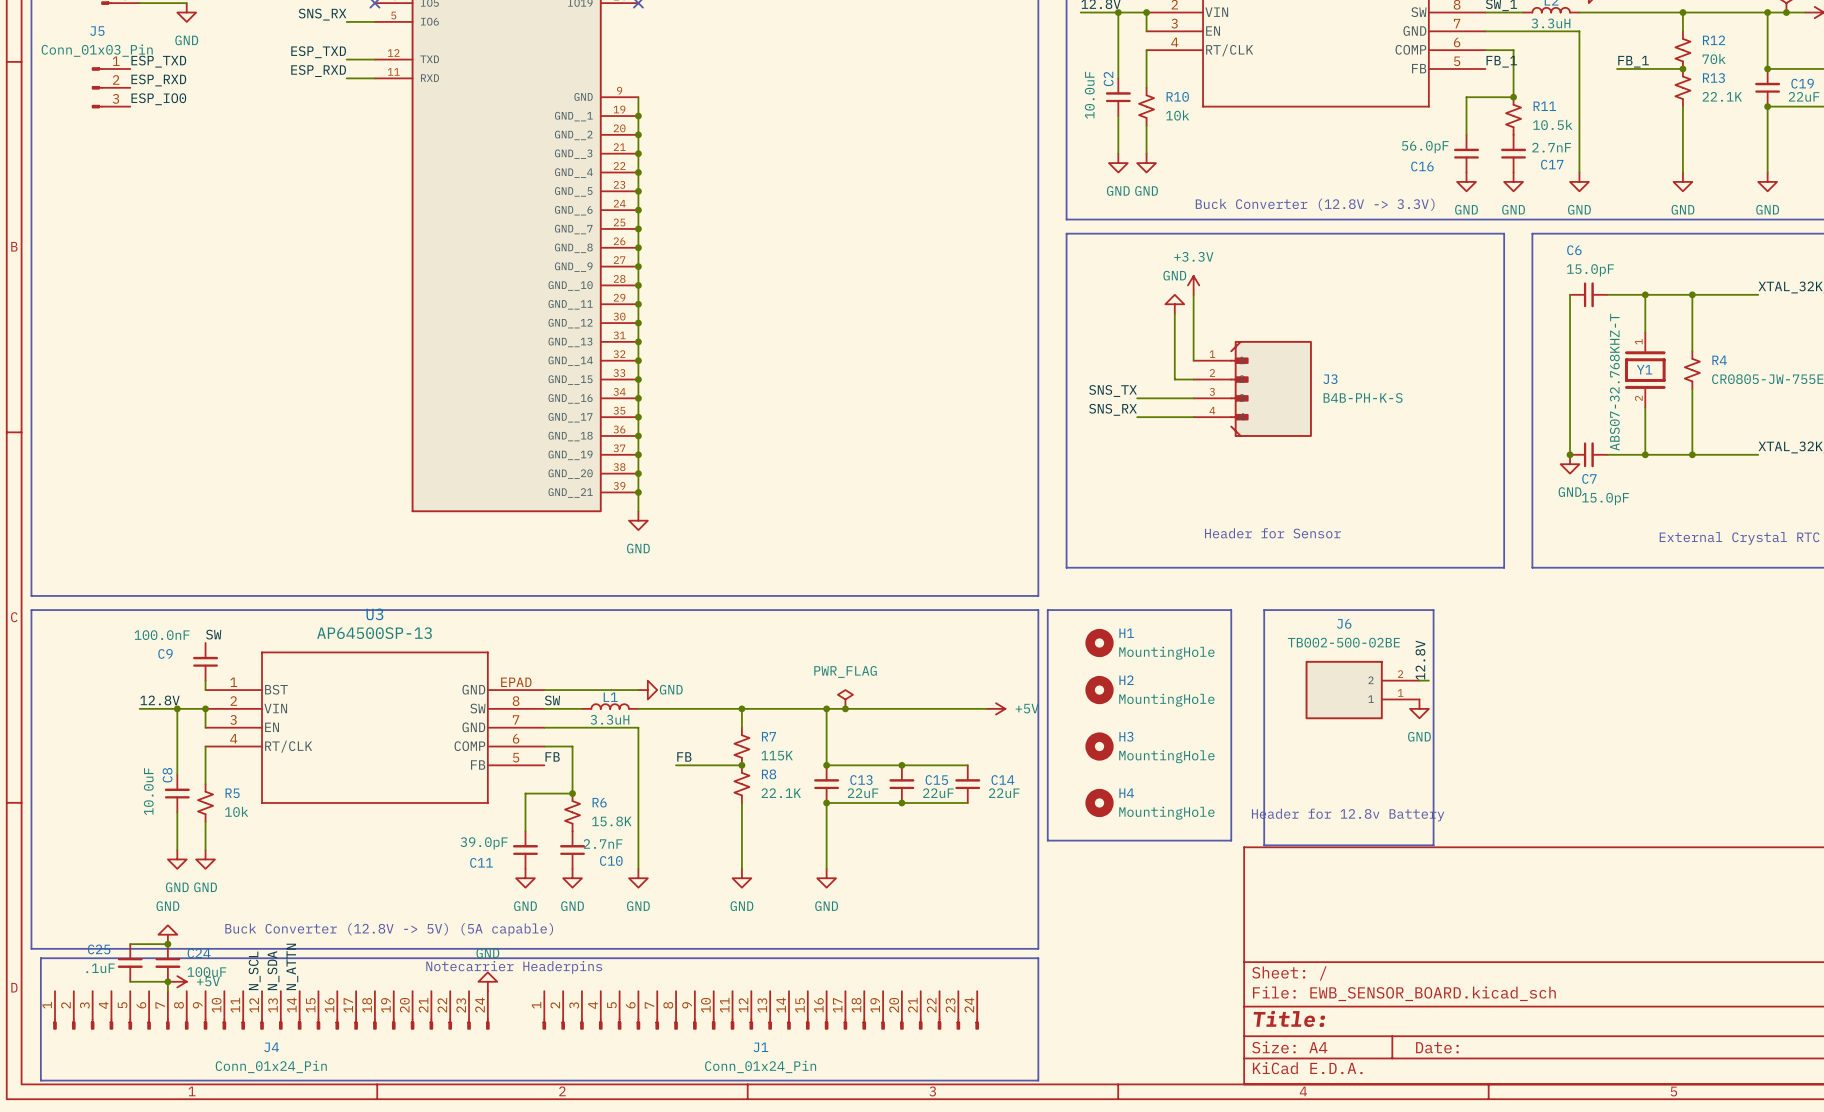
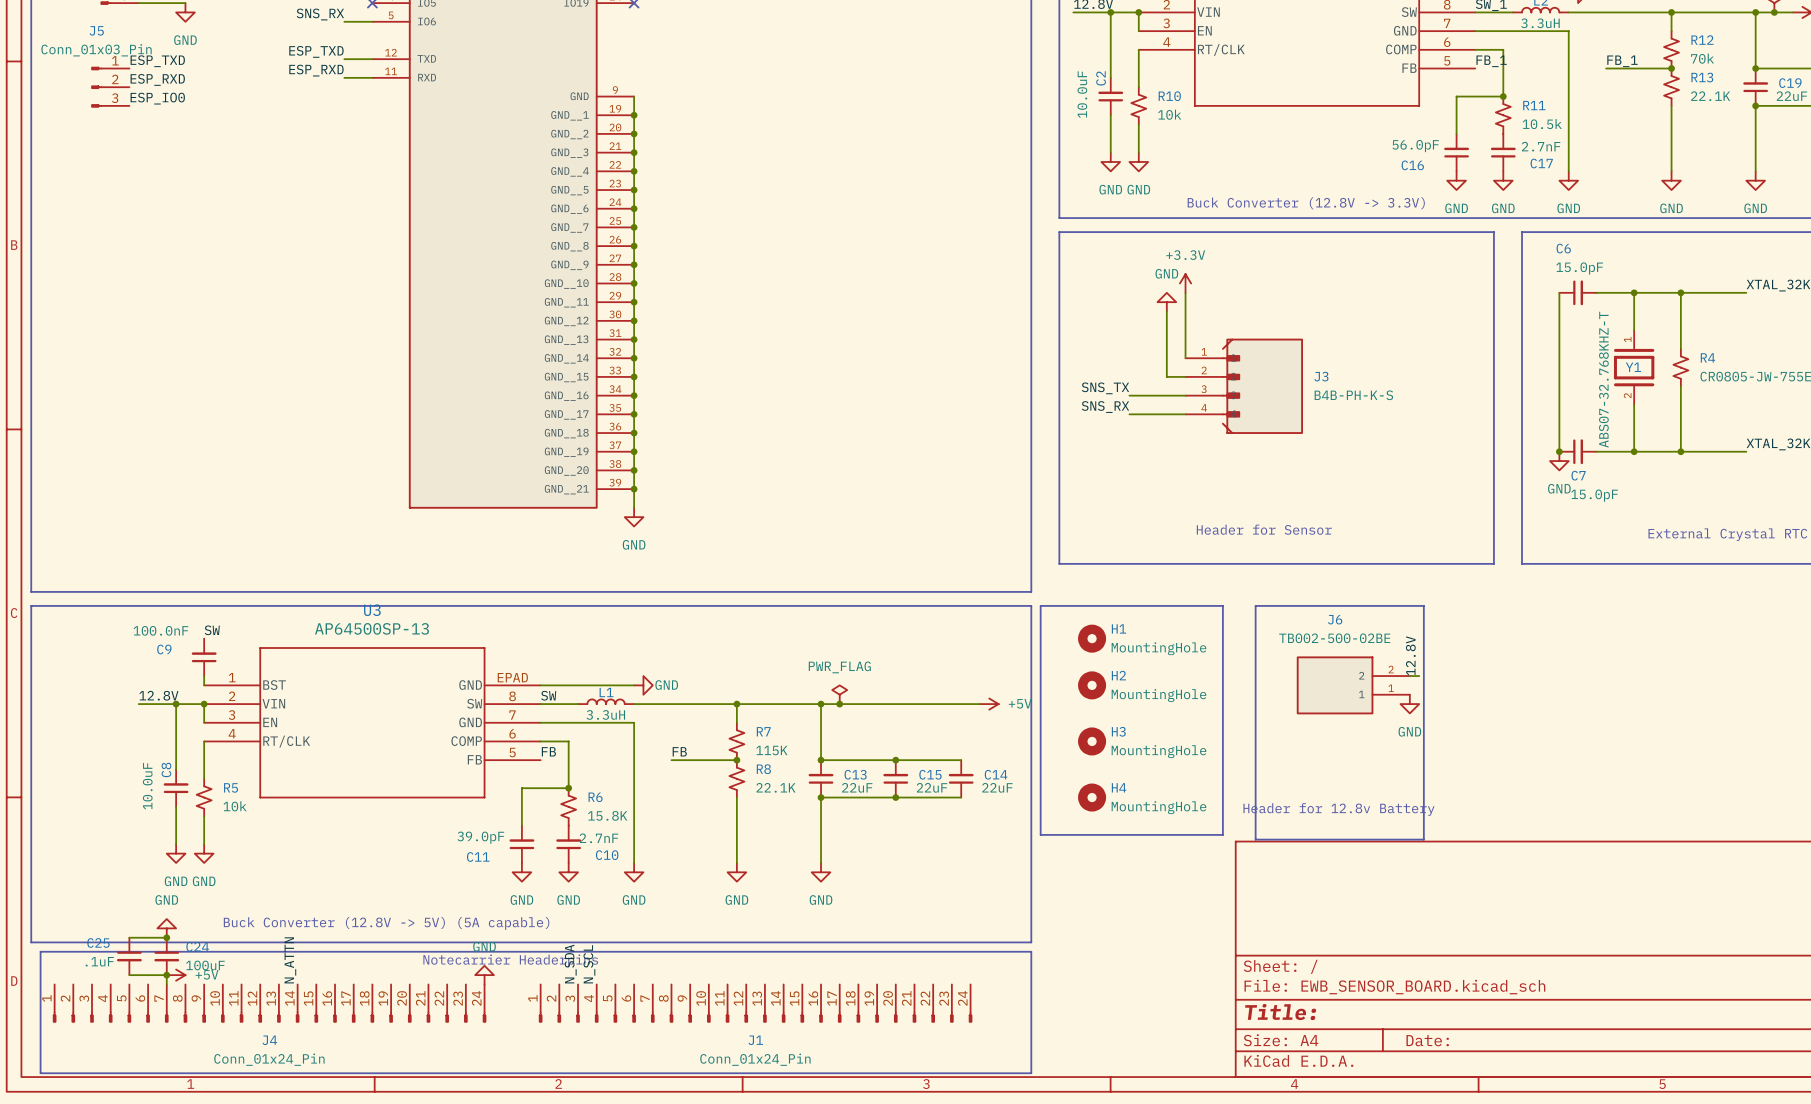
label: N_SCL (254, 970) -> none
label: N_SDA (273, 970) -> none
label: none -> N_SDA (570, 964)
label: none -> N_SCL (589, 964)

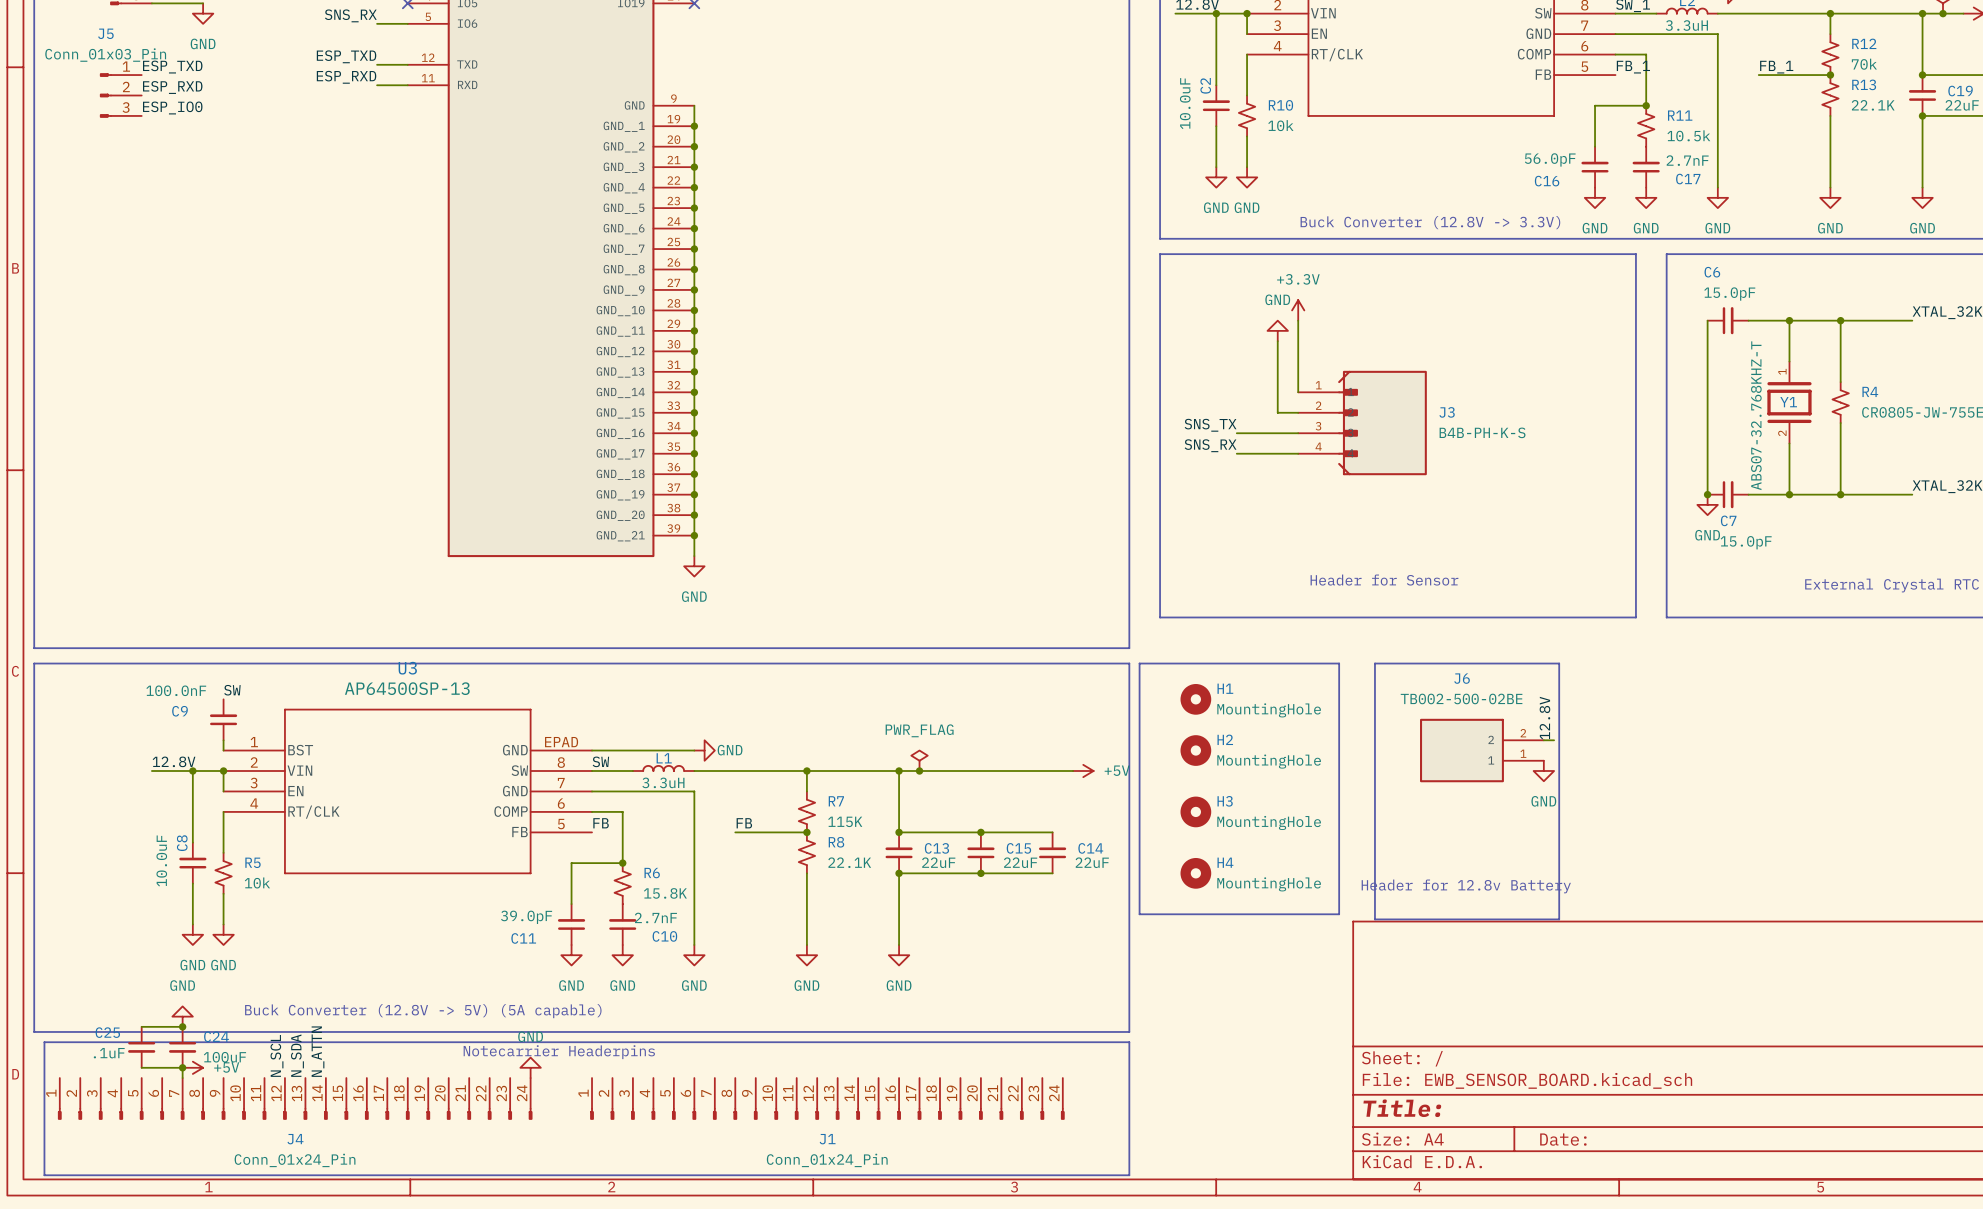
label: none -> N_SCL (276, 1055)
label: none -> N_SDA (297, 1055)
label: N_SDA (570, 964) -> none
label: N_SCL (589, 964) -> none

